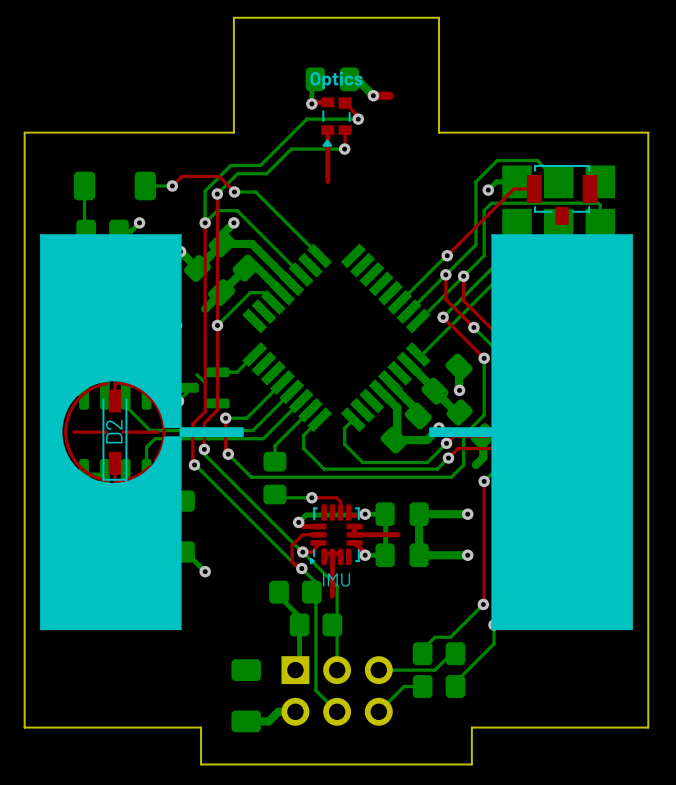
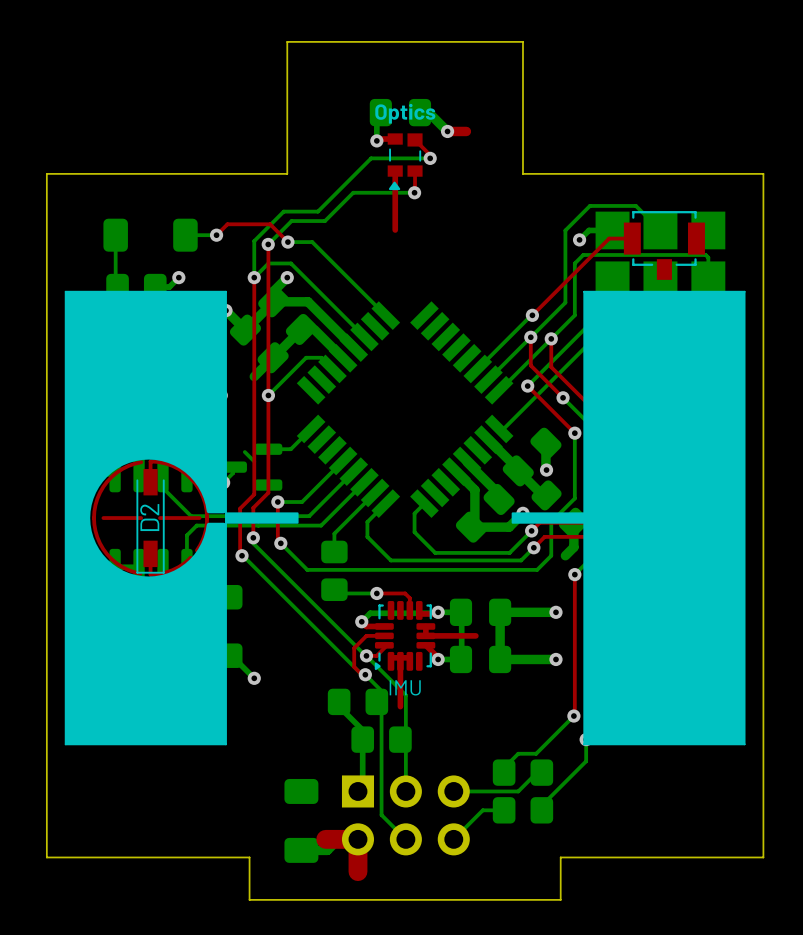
top track: none -> (325, 839) (357, 839) (357, 871)

